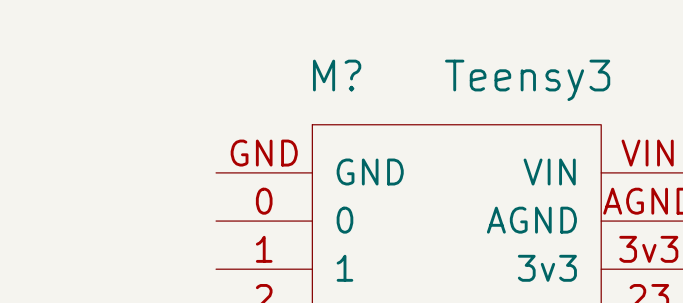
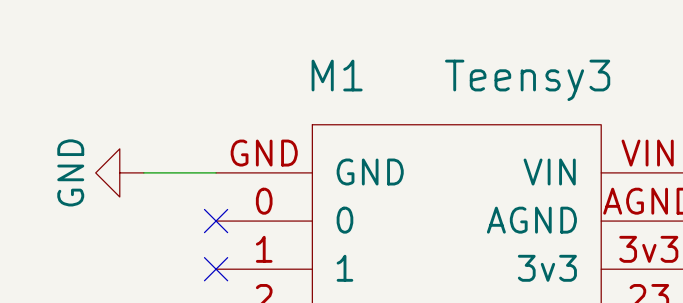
M? name: M? (337, 75) -> M1 (337, 75)
power symbol: none -> GND (119, 172)
wire: none -> (143, 172) (216, 172)
no-connect mark: none -> (216, 221)
no-connect mark: none -> (216, 269)

